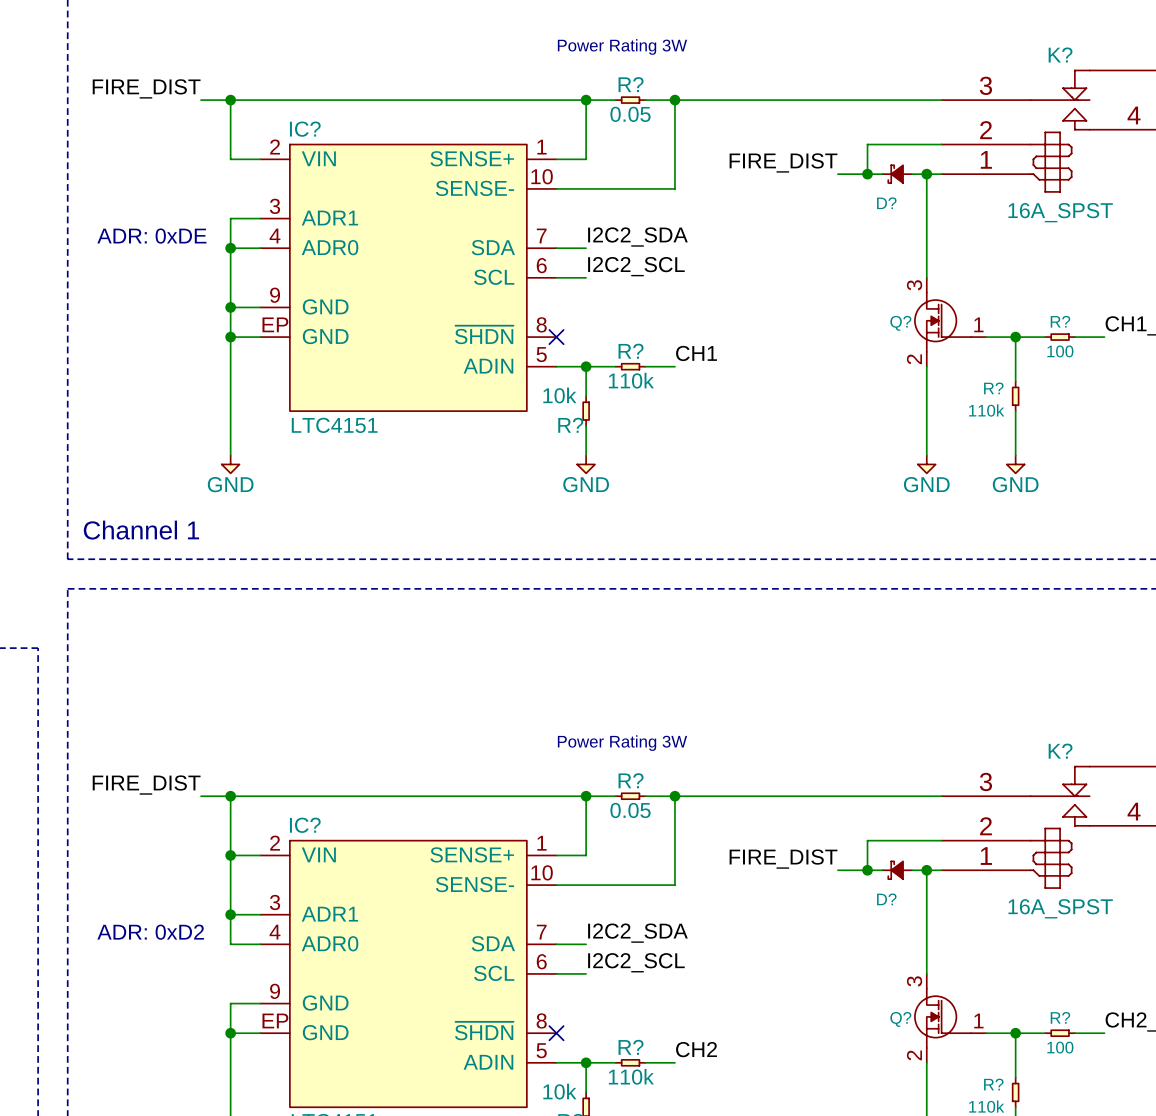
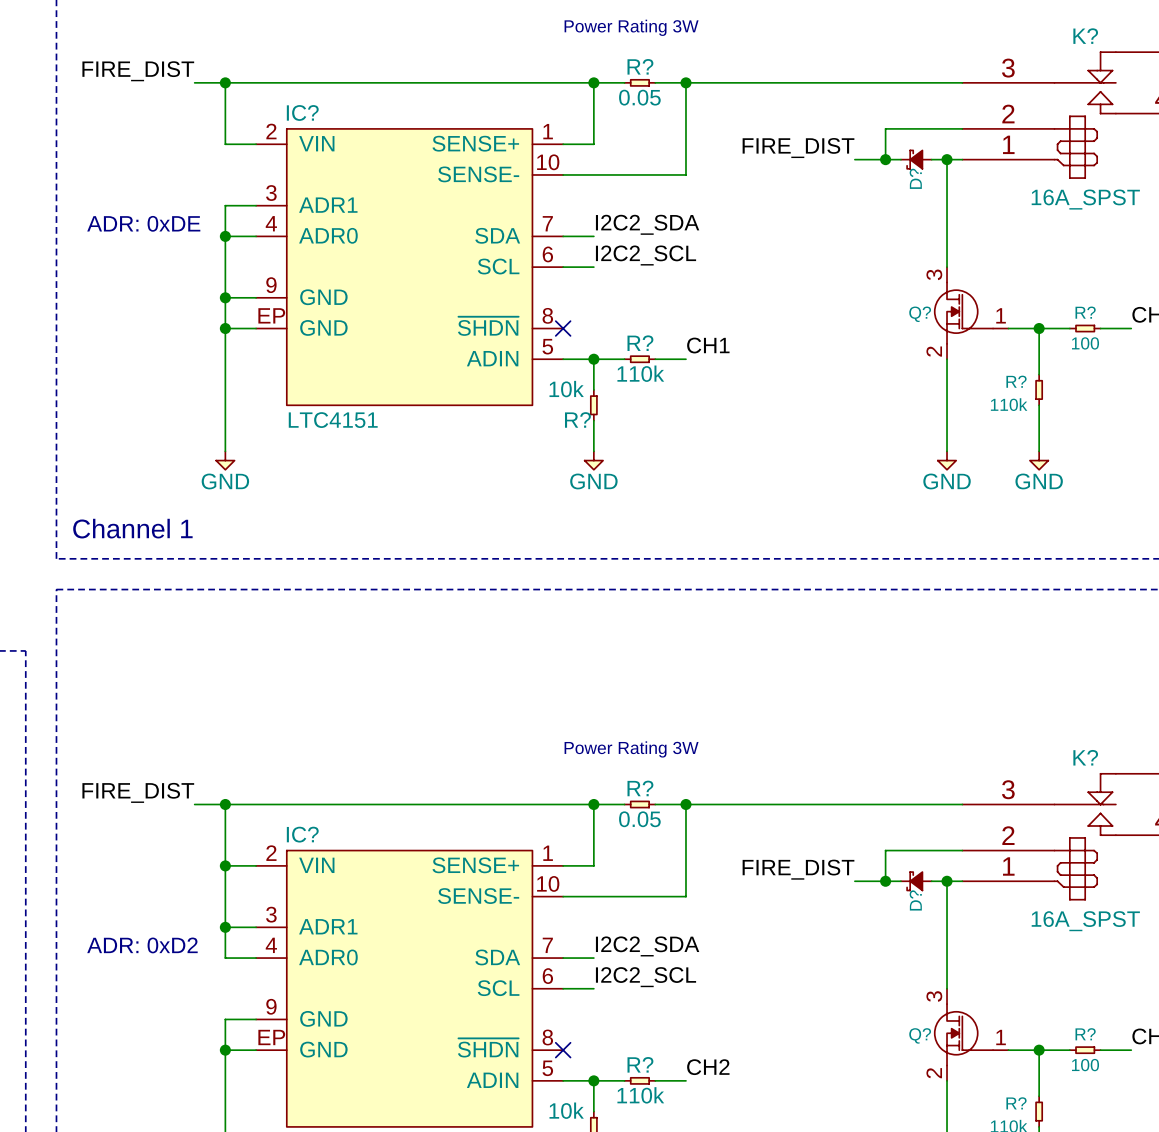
D? name rotation: 0° (886, 203) -> 90° counterclockwise (915, 178)
D? name rotation: 0° (886, 899) -> 90° counterclockwise (915, 900)

